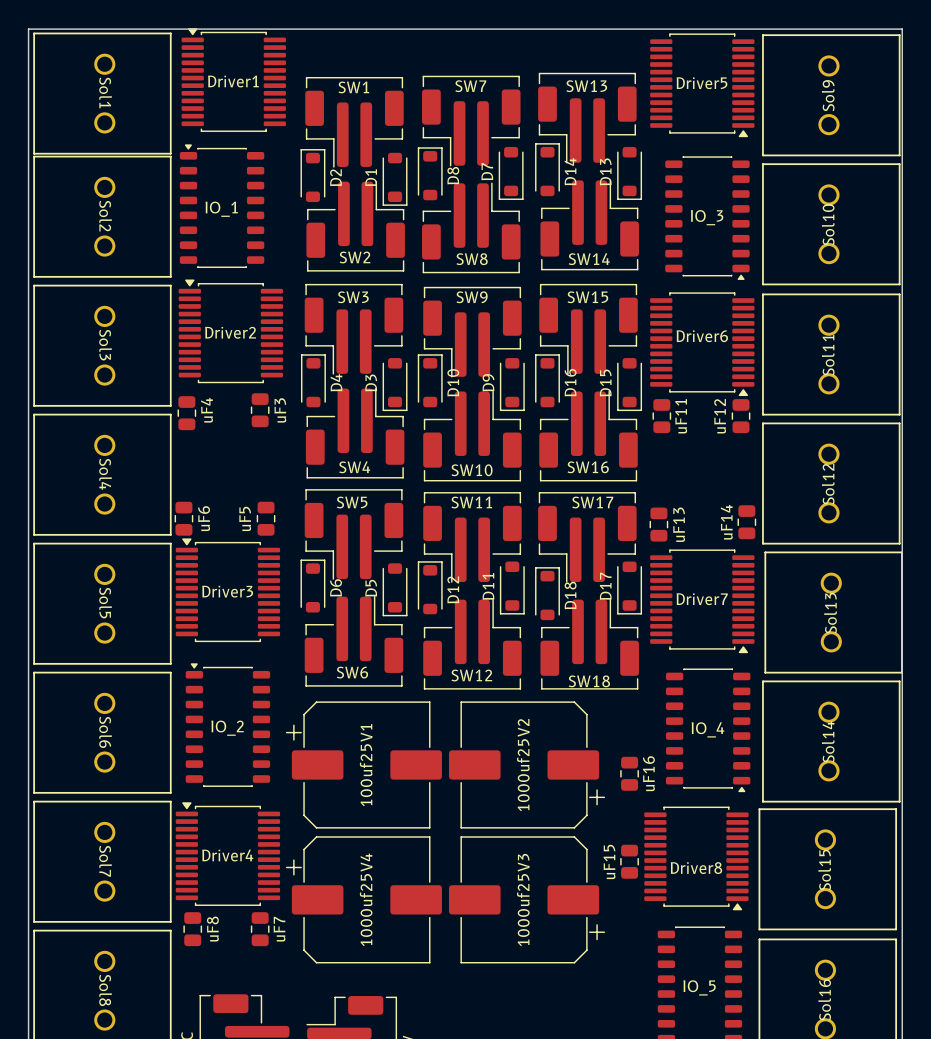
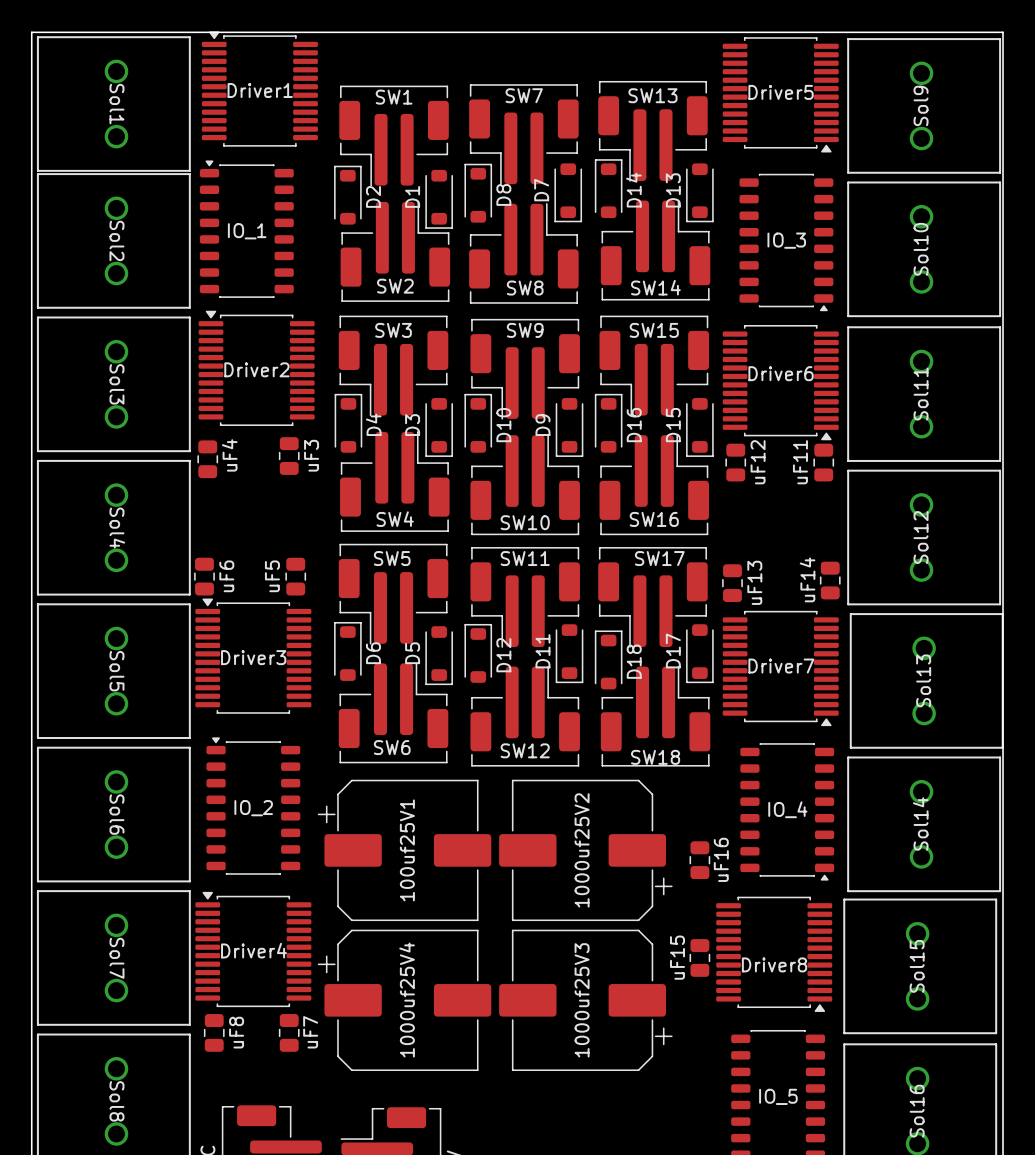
uF11 name: uF11 (681, 416) -> uF12 (758, 462)
uF12 name: uF12 (720, 416) -> uF11 (800, 462)

